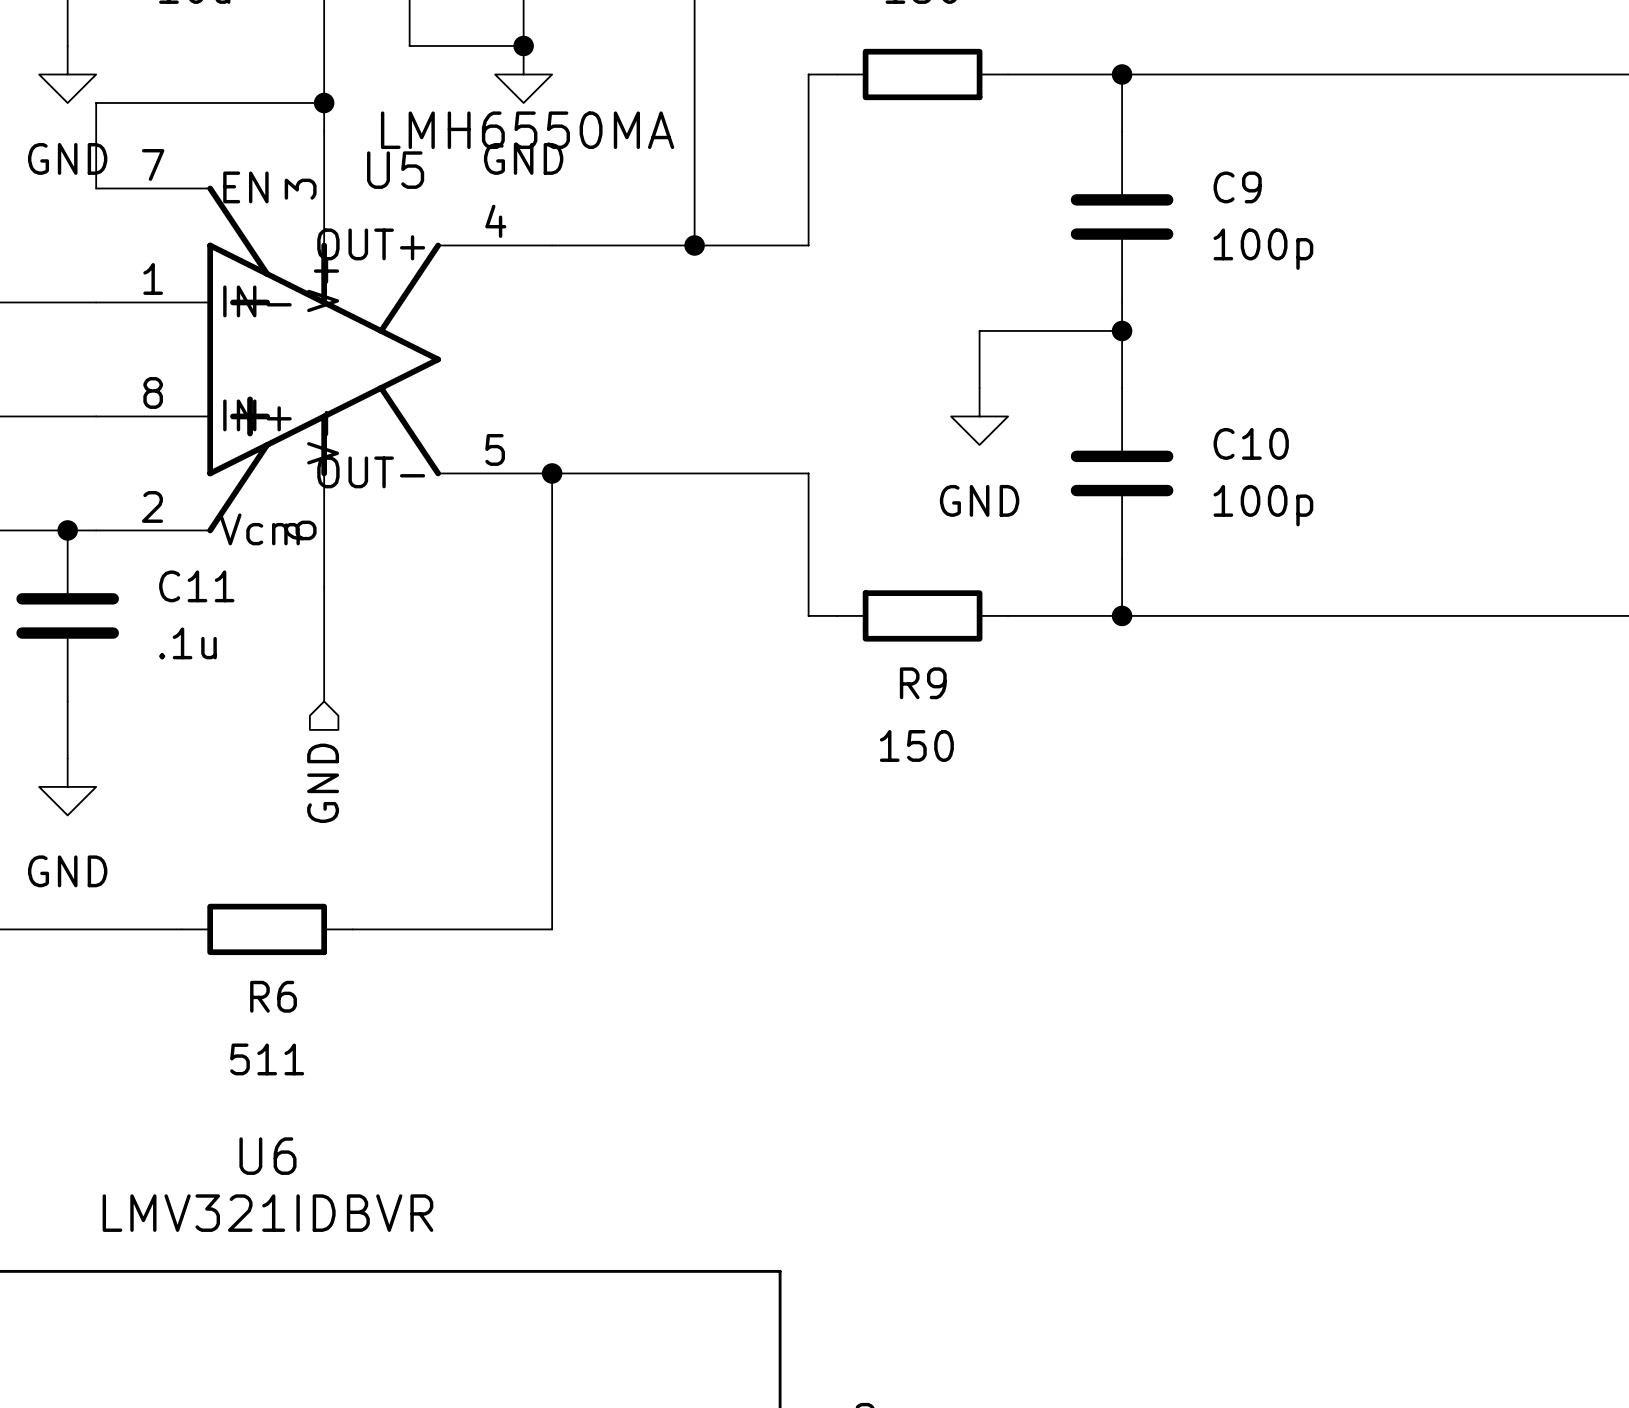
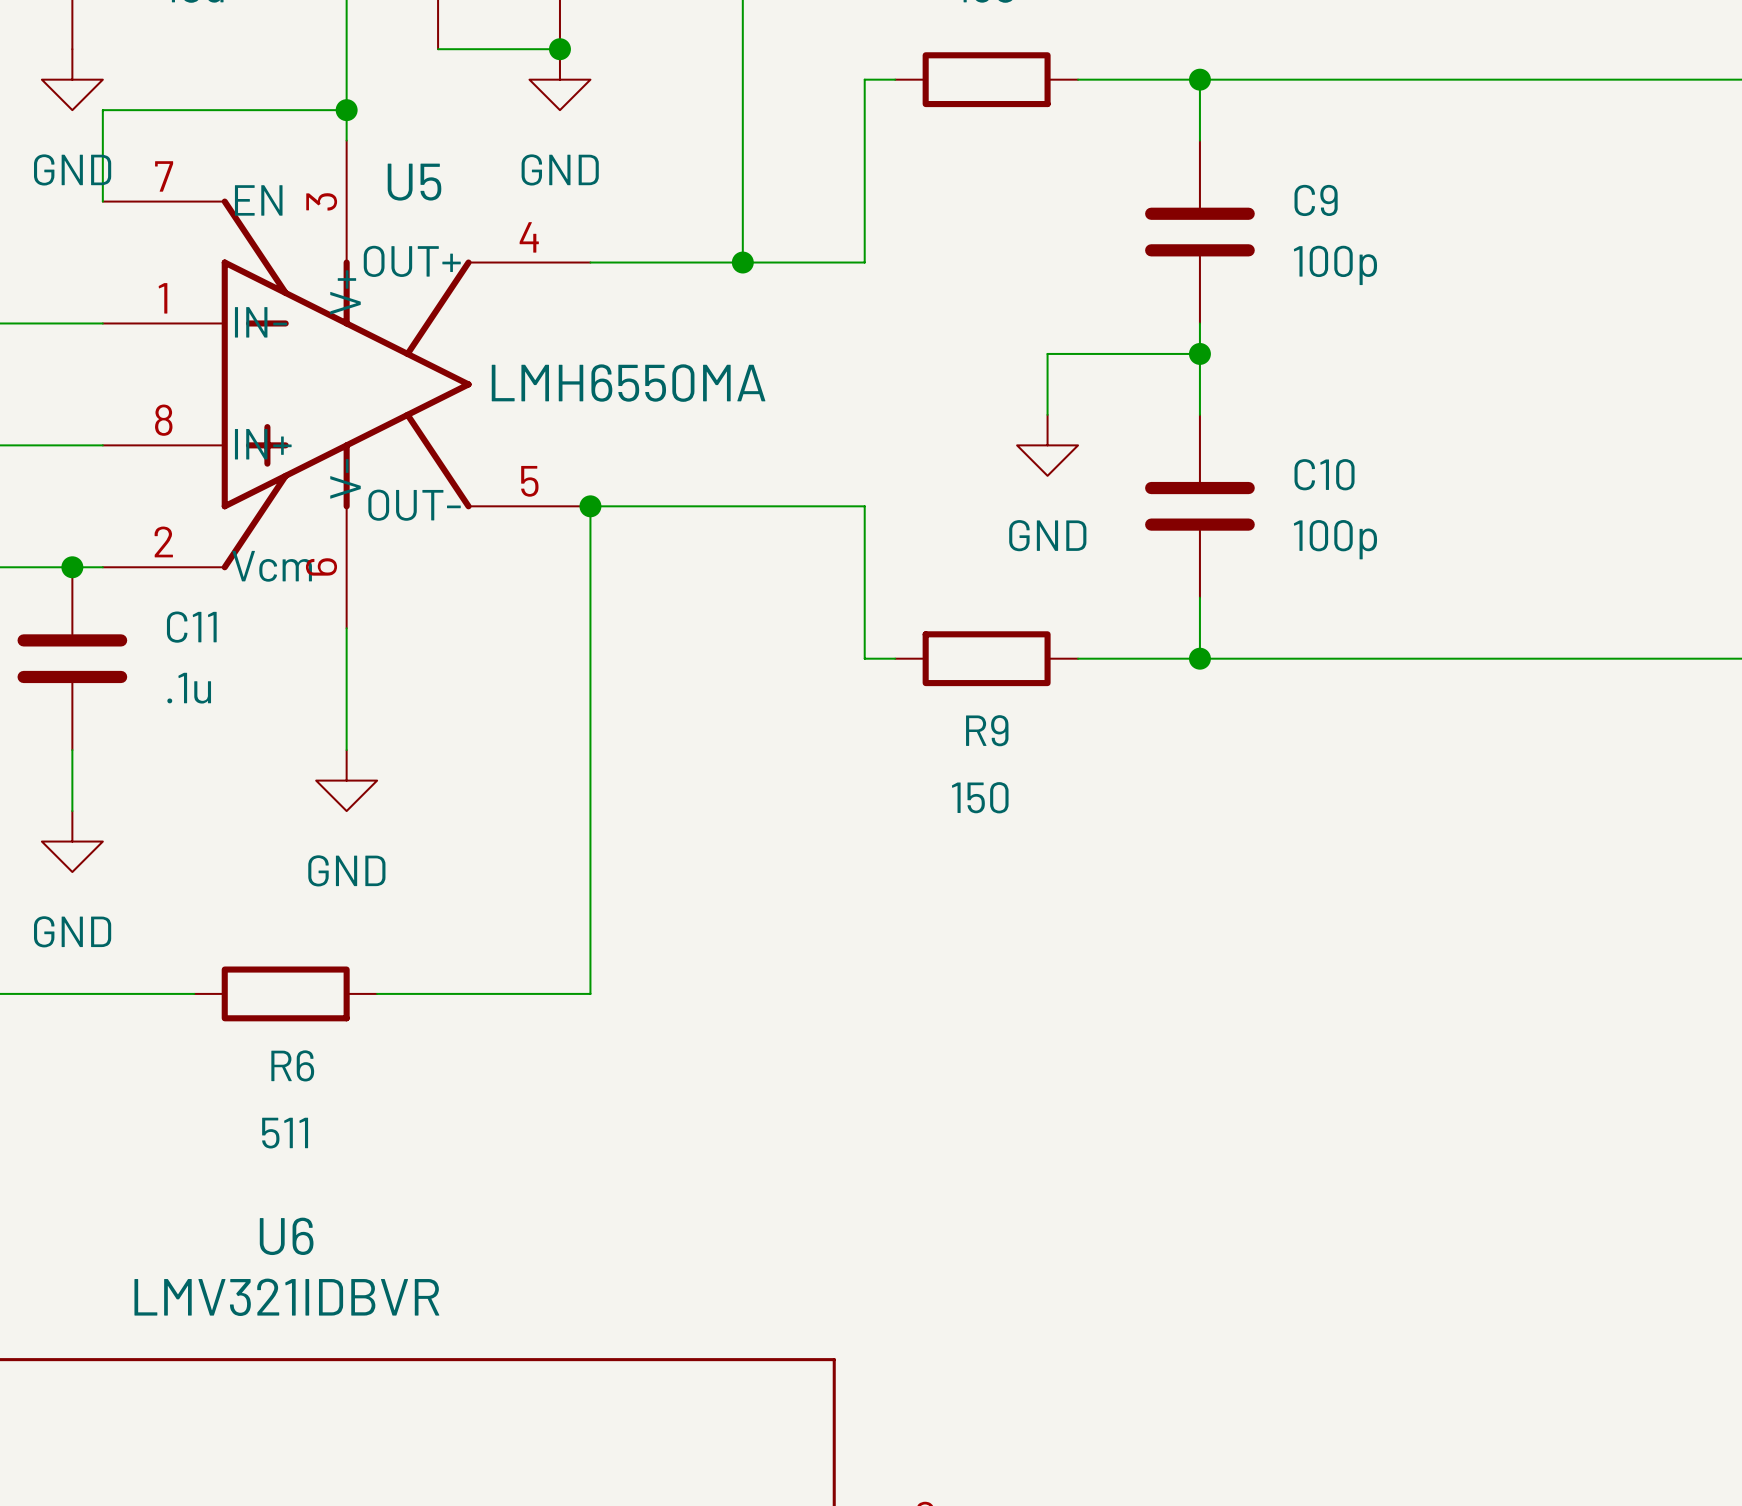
U5 value position: LMH6550MA (527, 130) -> LMH6550MA (628, 383)
power symbol: none -> GND (346, 780)
hierarchical label: GND (323, 783) -> none

